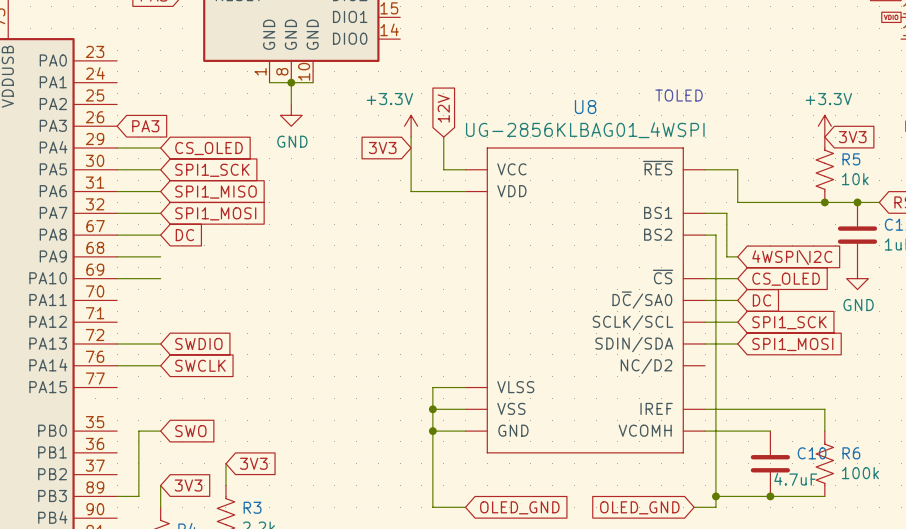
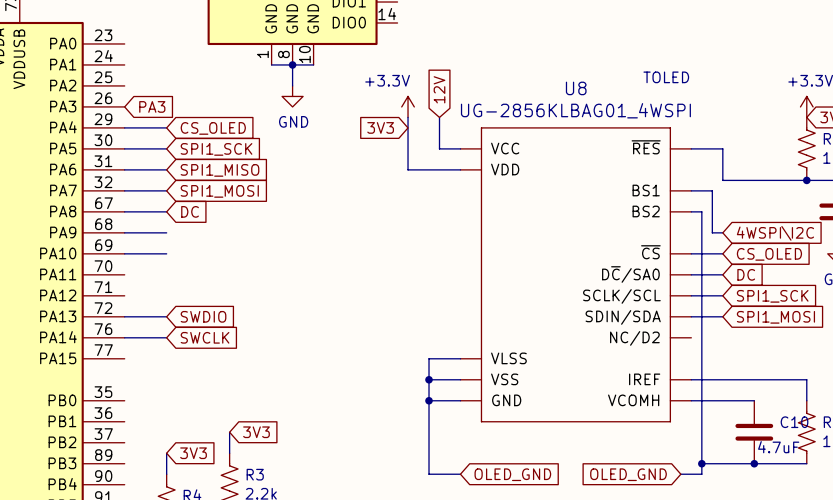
wire: (160, 431) (138, 431) (138, 496) (117, 496) -> none
global label: SWO (190, 431) -> none

